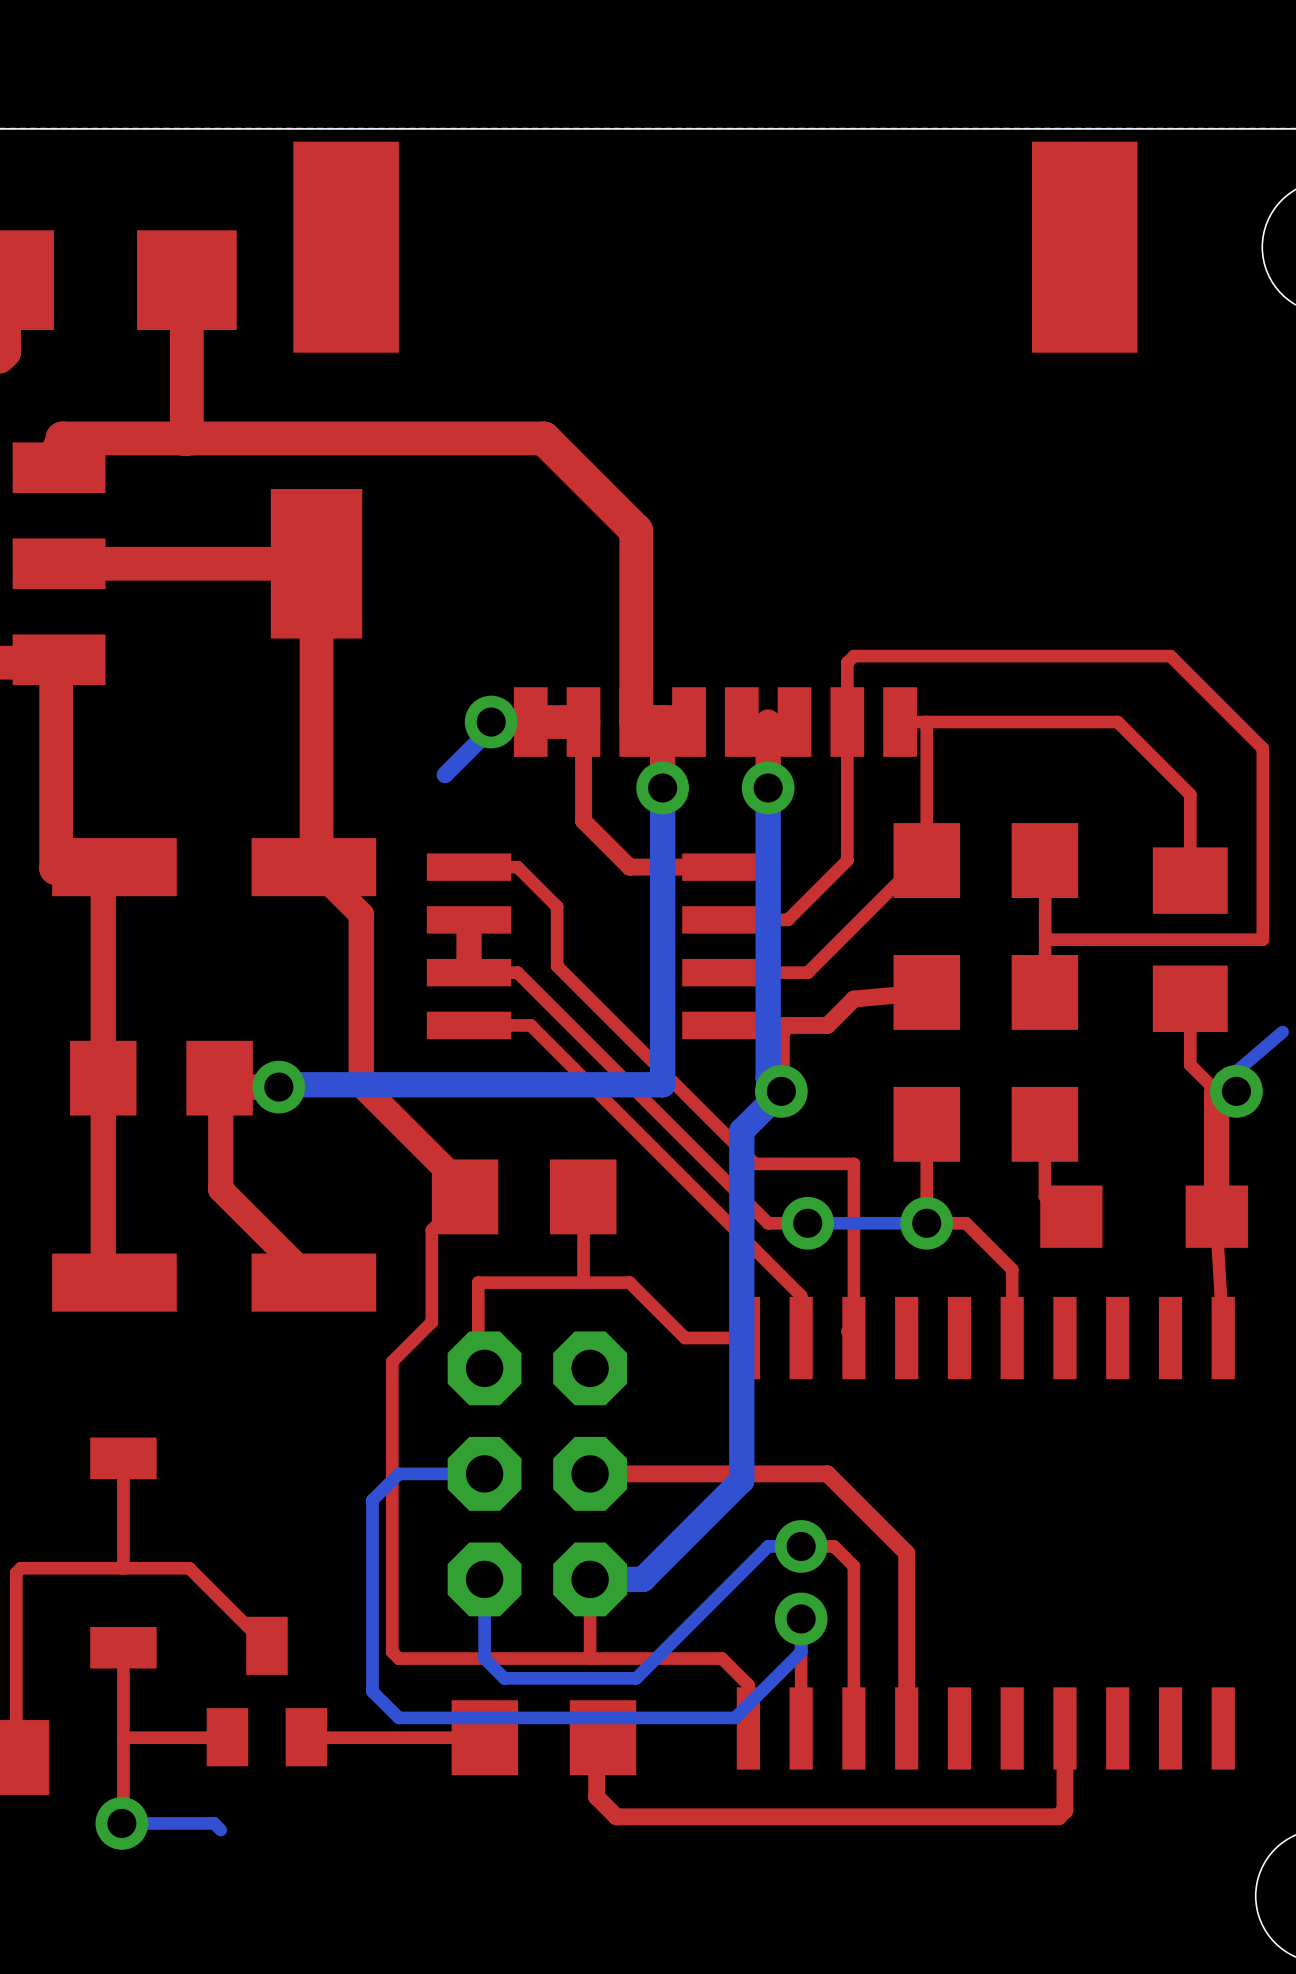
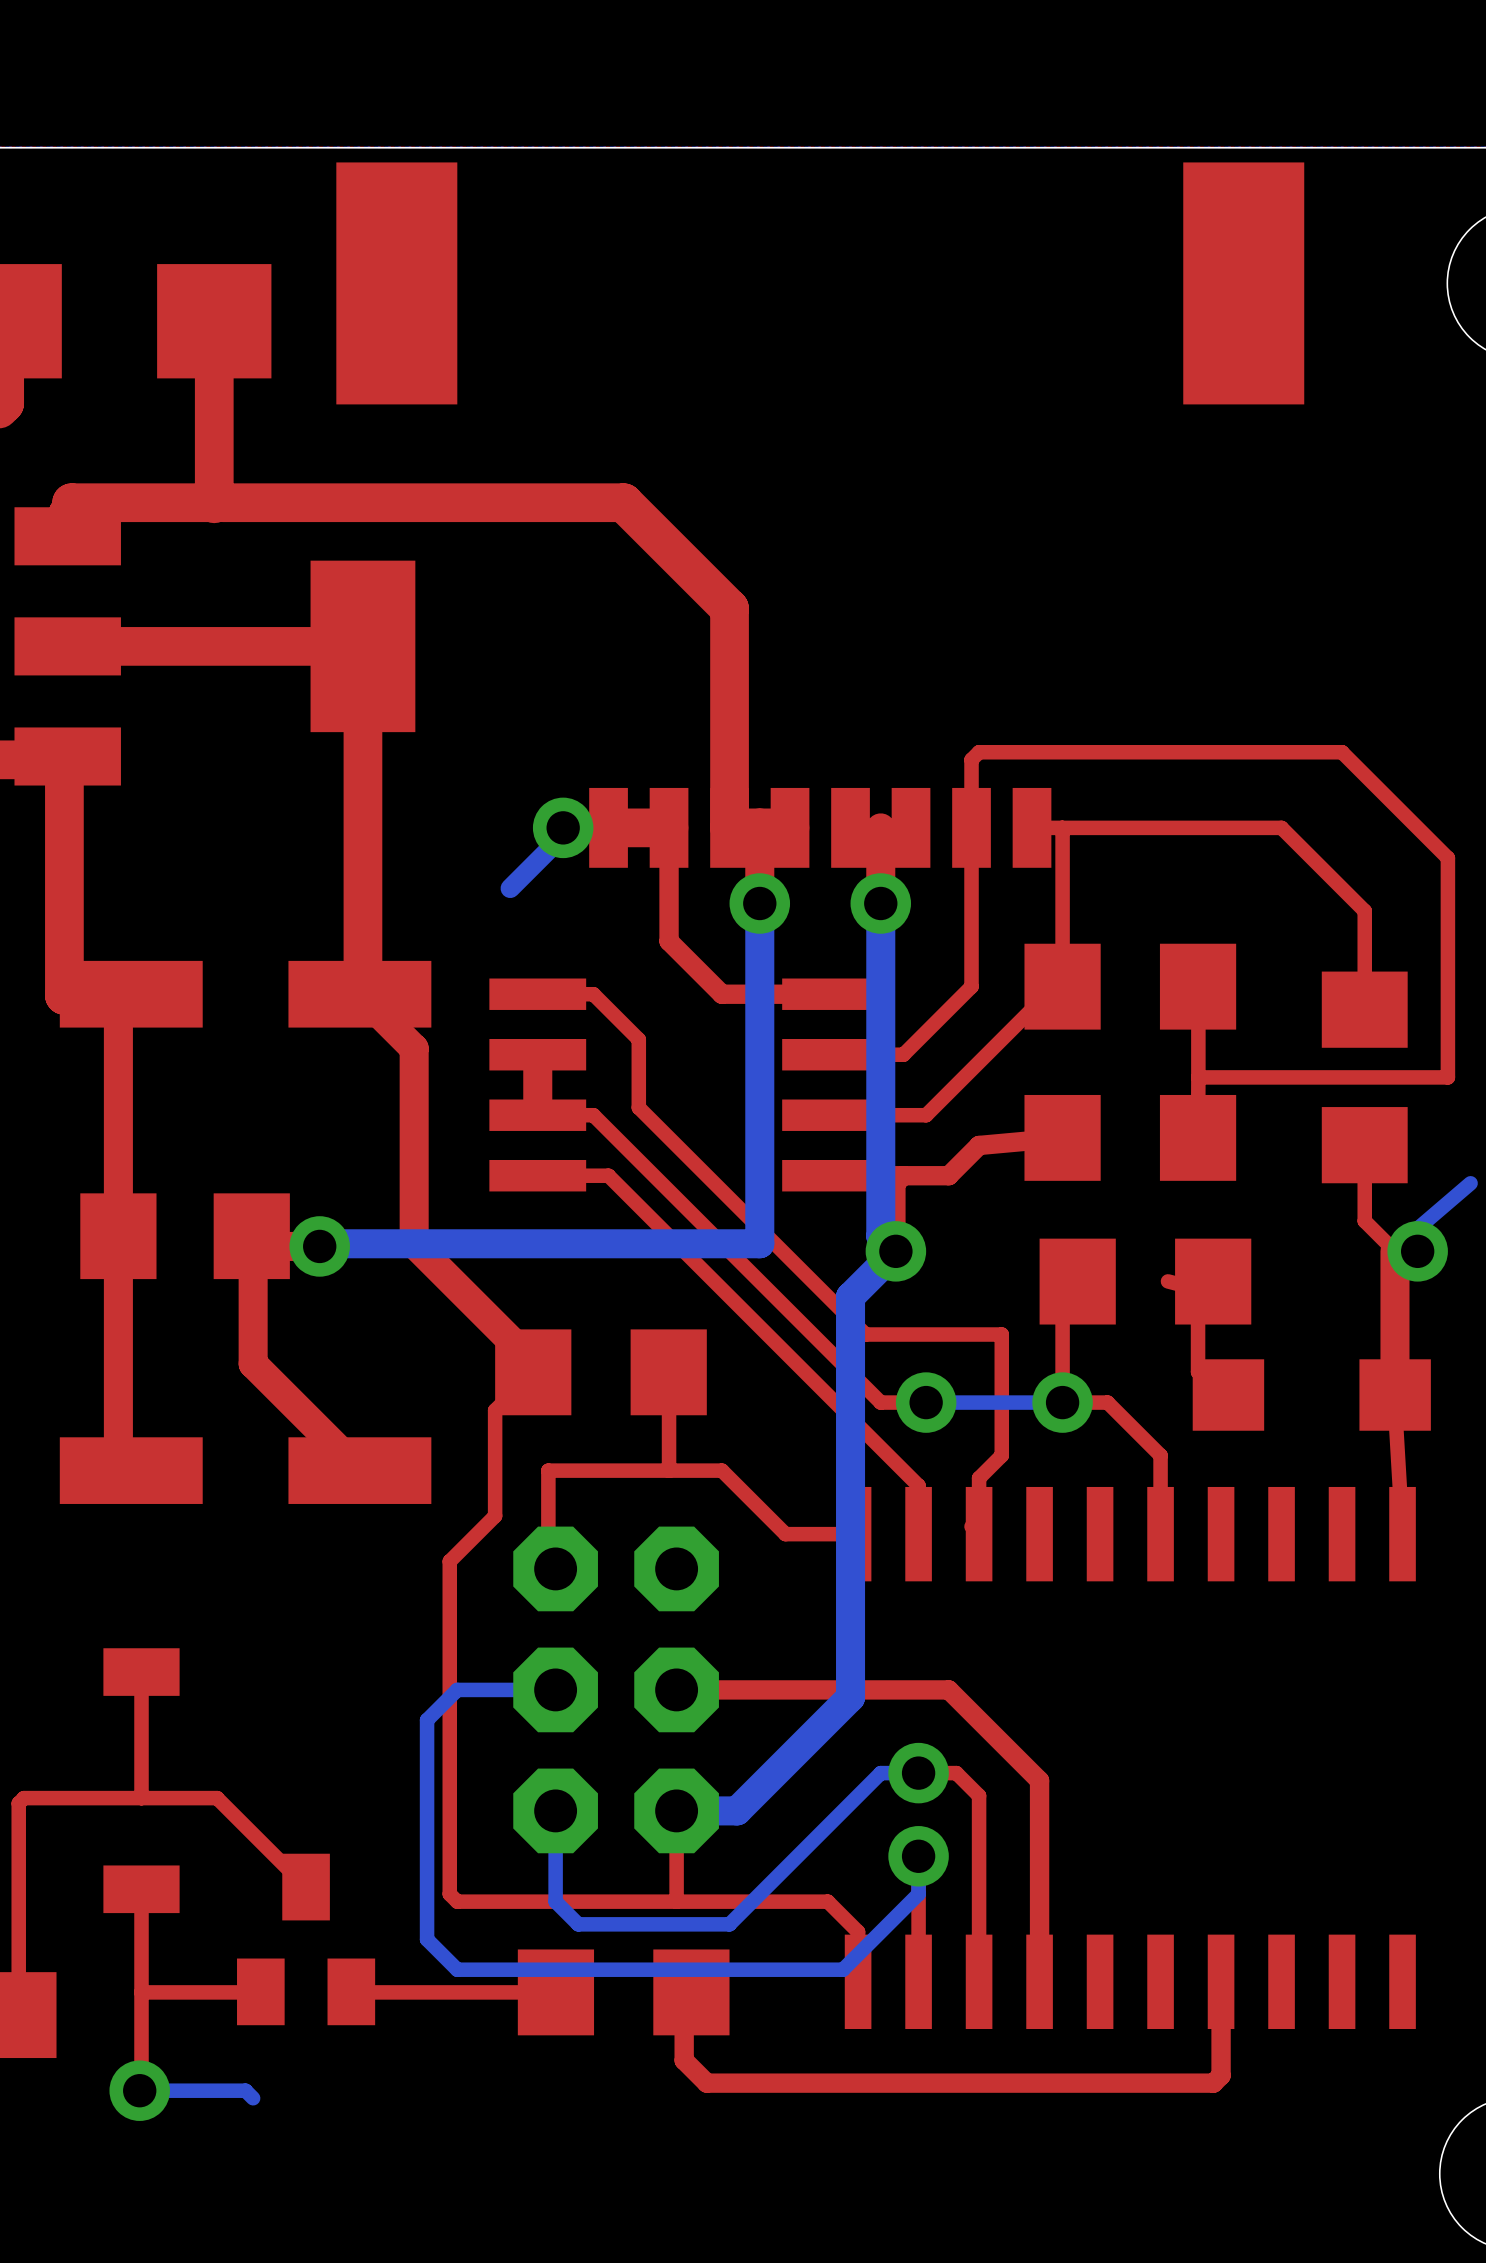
part position: (985, 1124) -> (1145, 1281)
top track: (853, 1163) (853, 1289) -> (979, 1334) (1001, 1334) (1001, 1455) (979, 1478)

